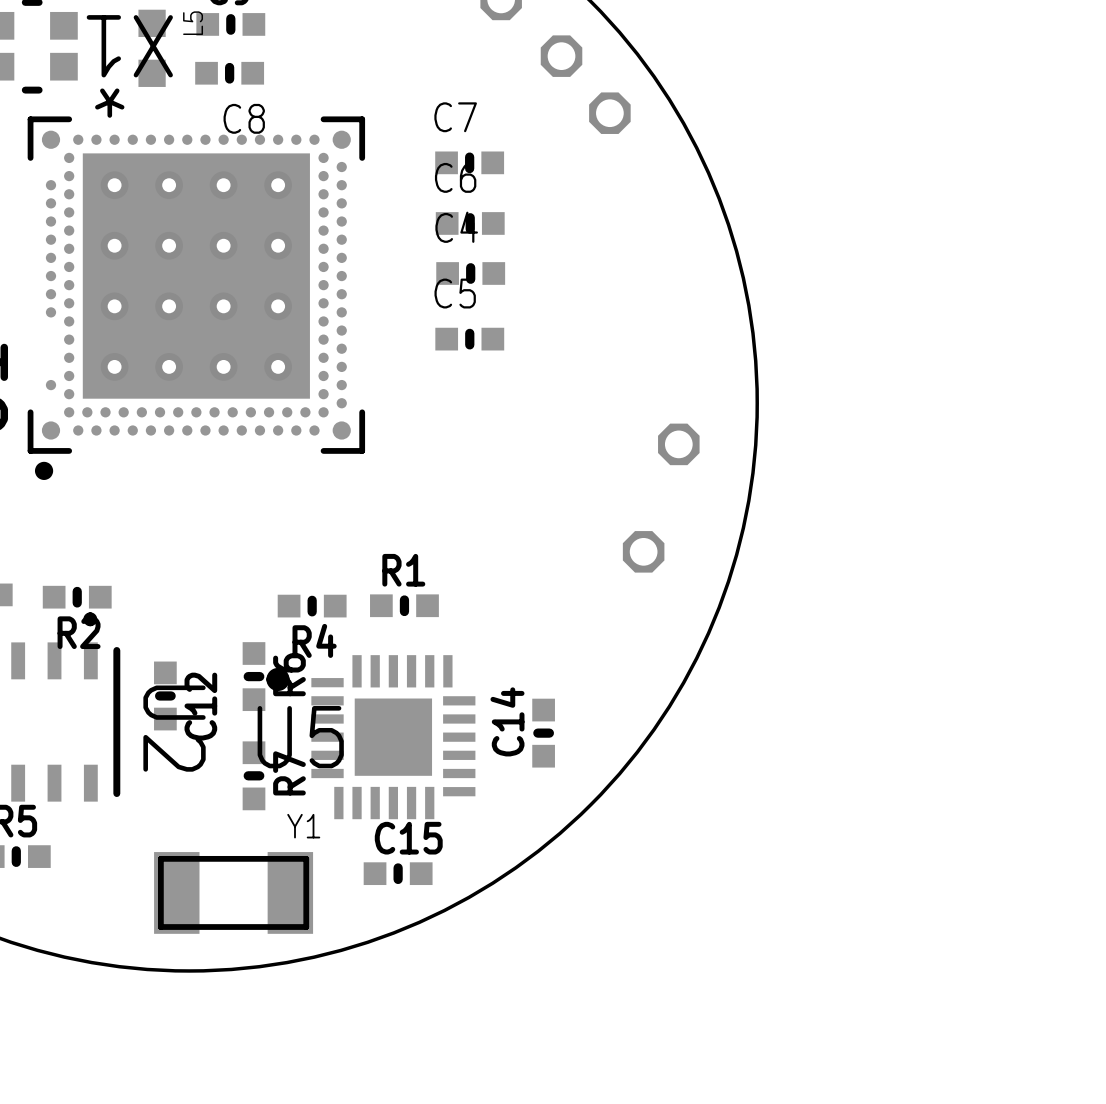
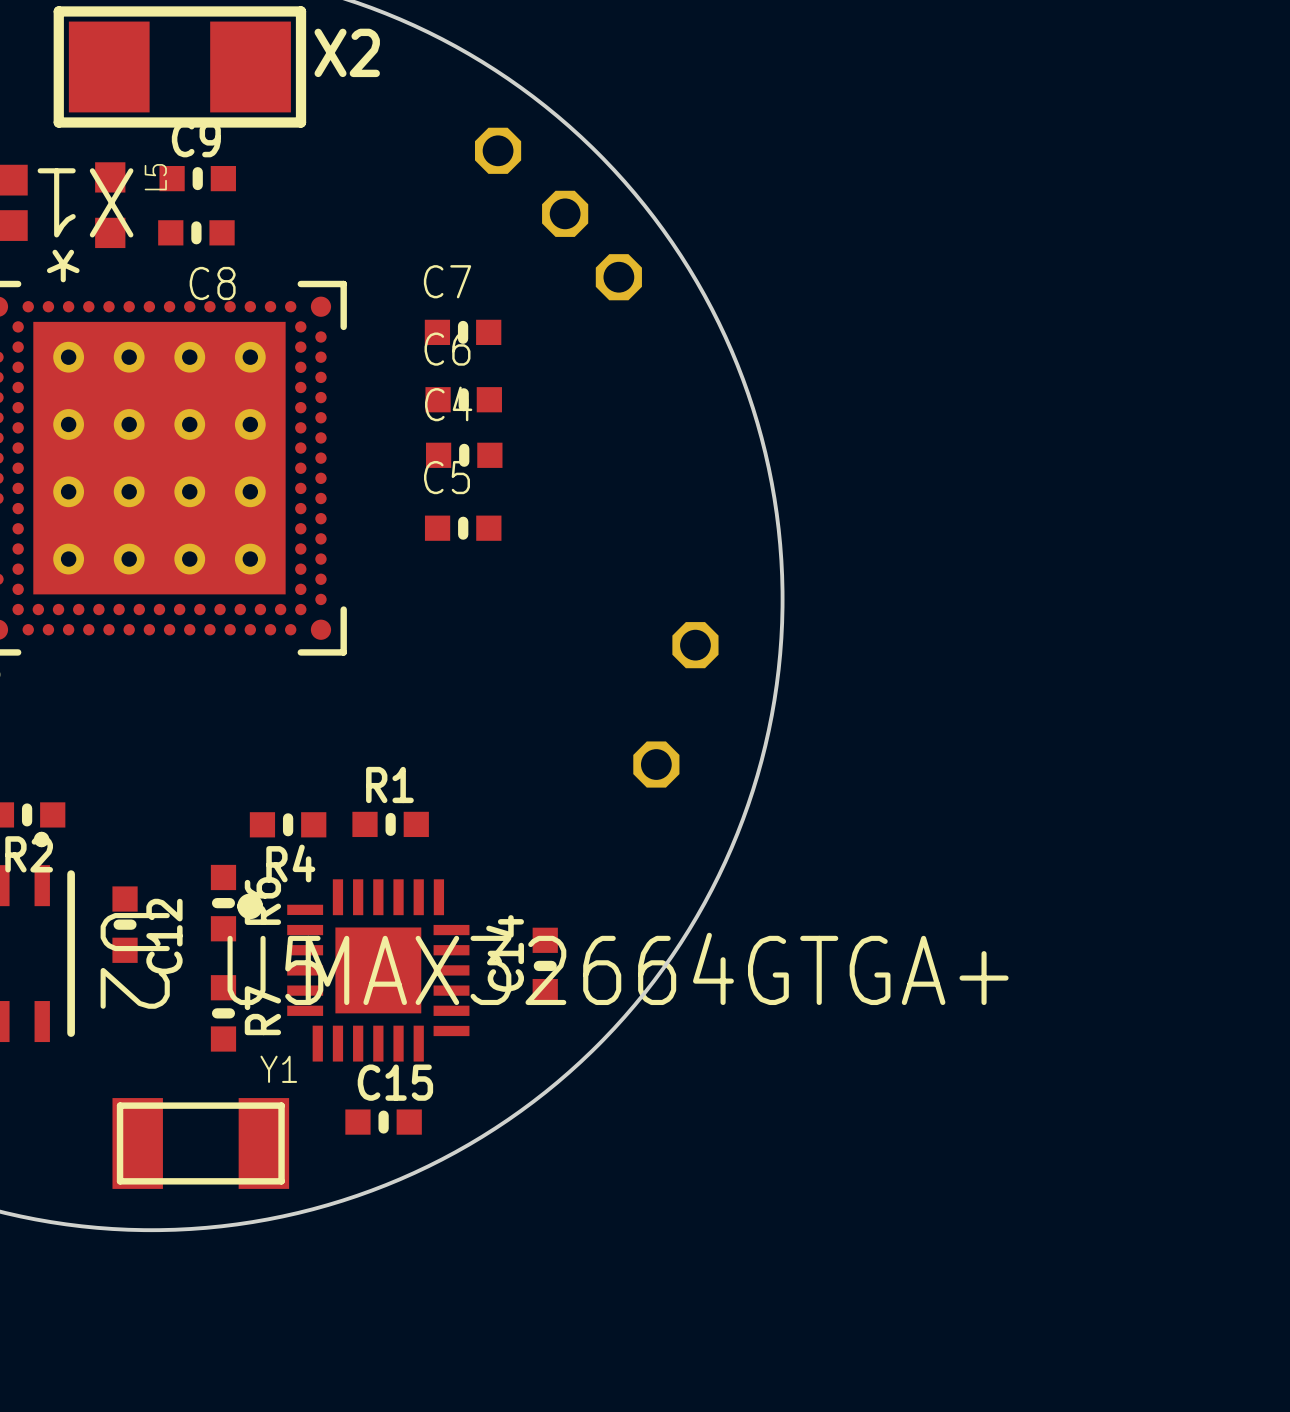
U5 value: none -> MAX32664GTGA+ (657, 968)

